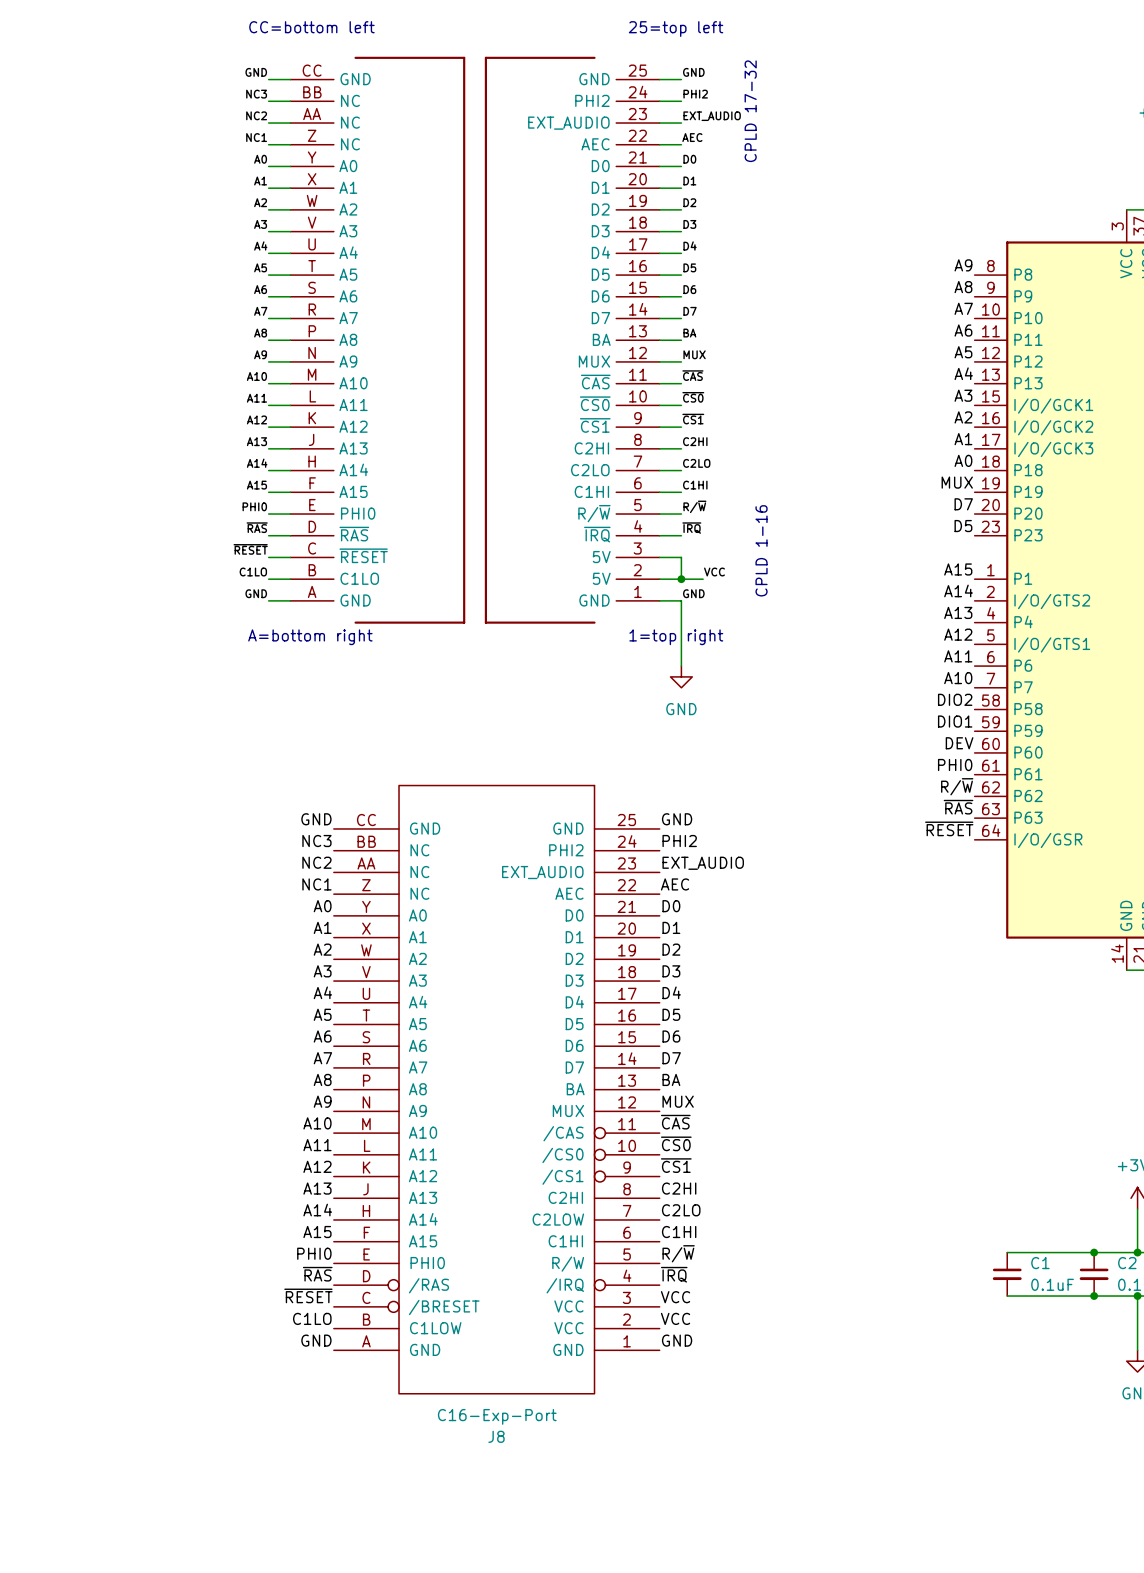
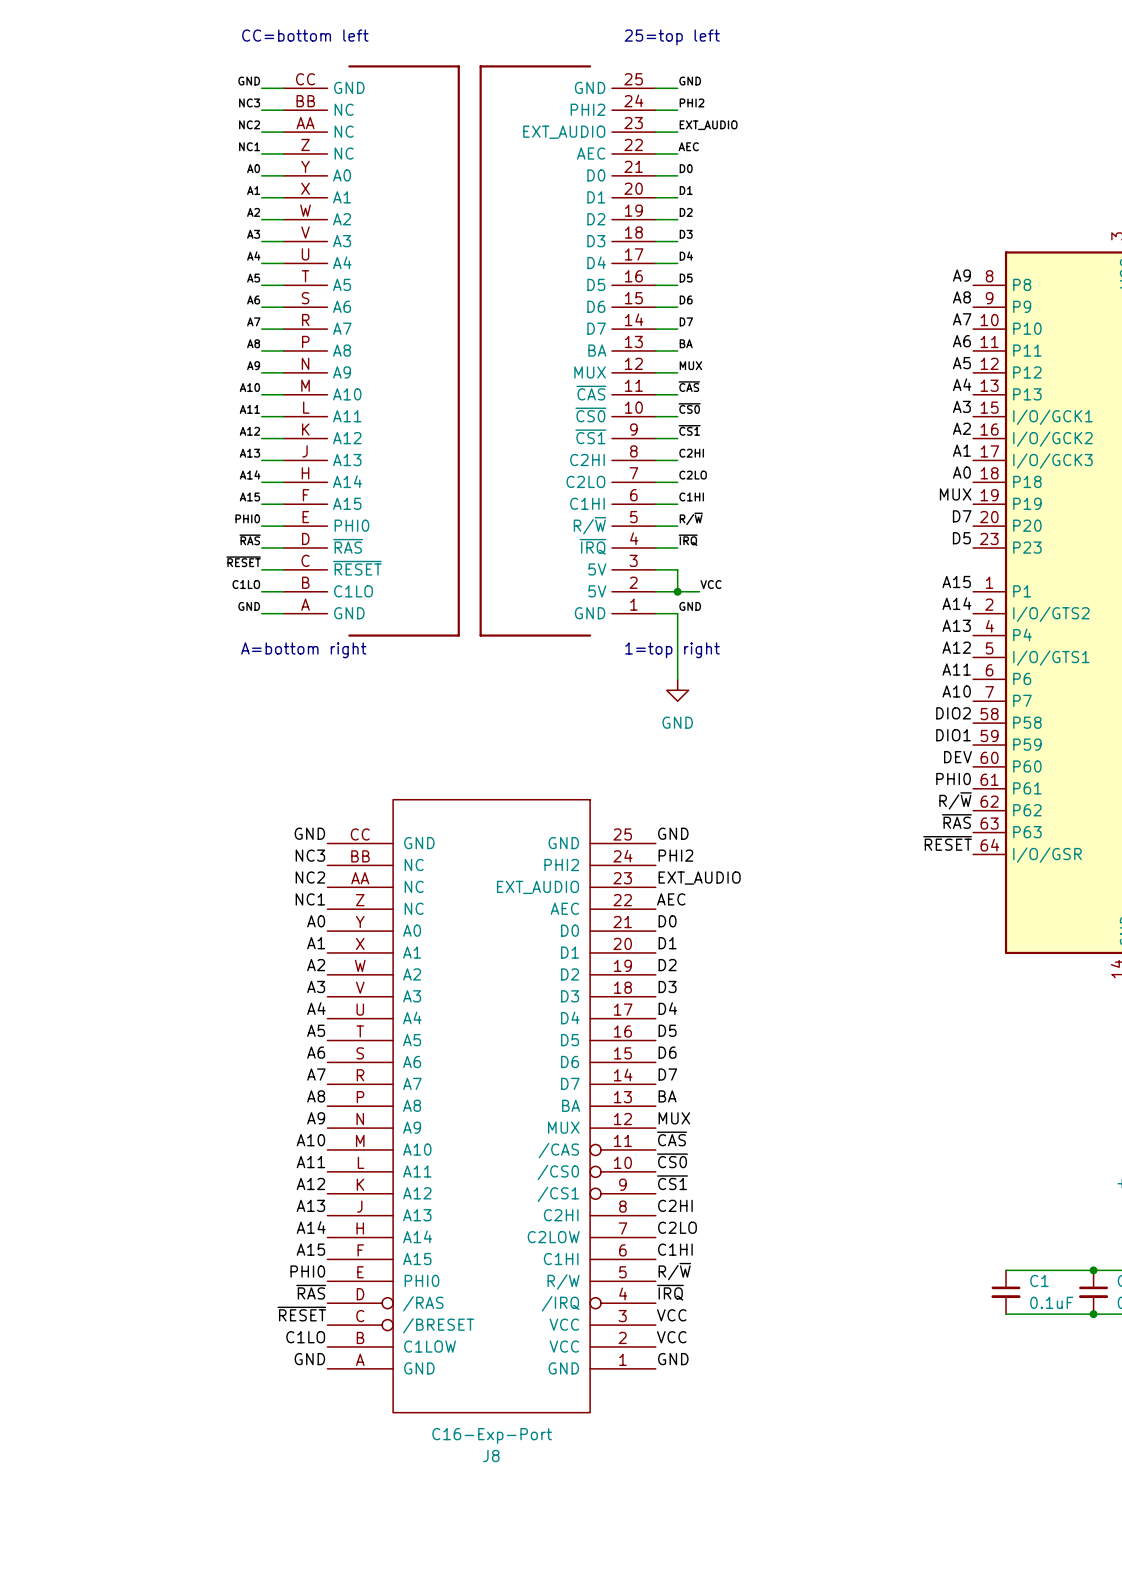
text: CPLD 17-32 (750, 111) -> none
text: CPLD 1-16 (761, 550) -> none

